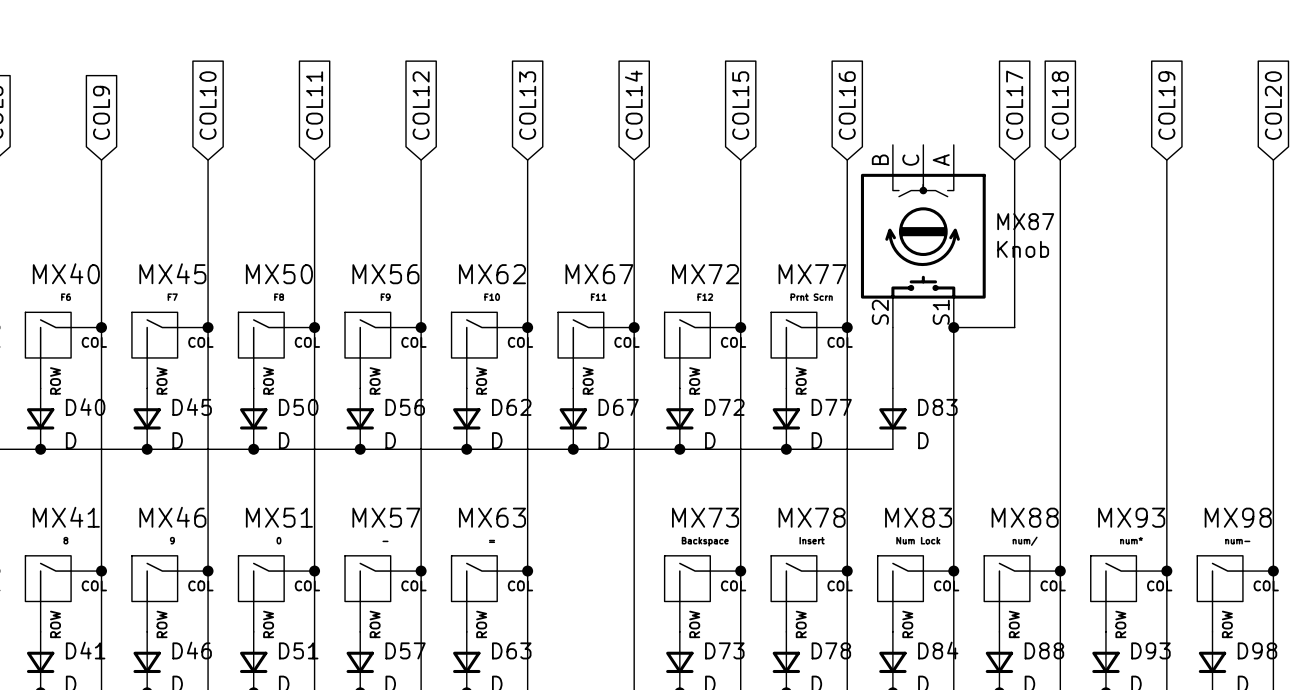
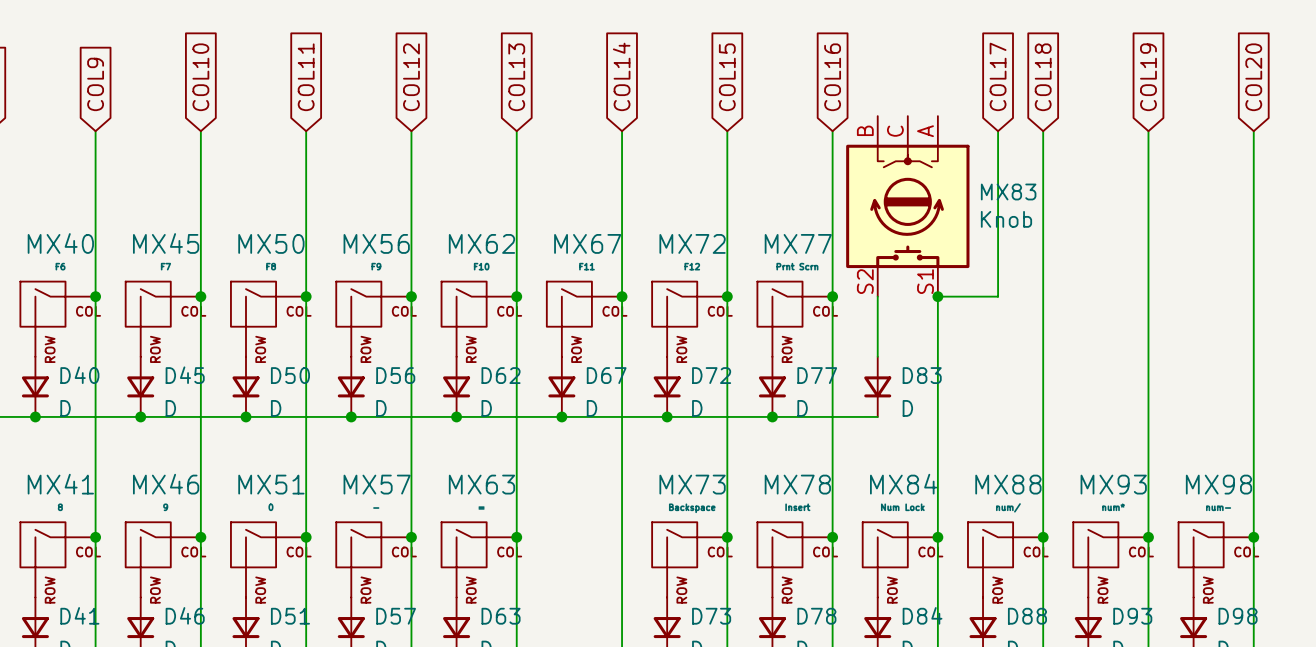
MX87 name: MX87 (1025, 221) -> MX83 (1008, 191)
MX83 name: MX83 (918, 517) -> MX84 (903, 484)

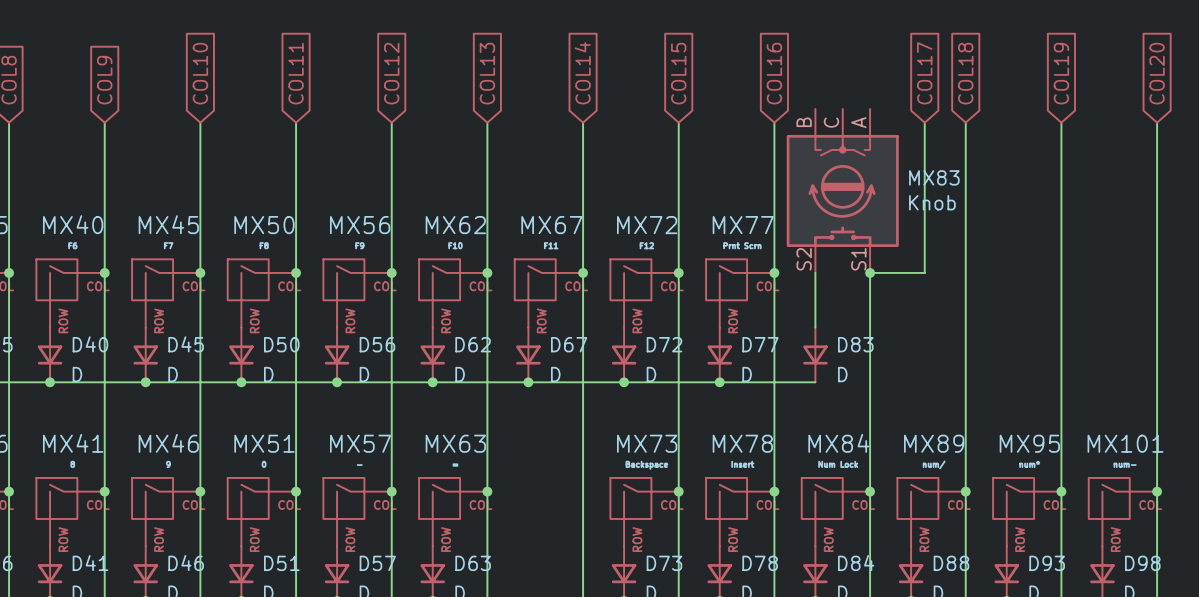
MX88 name: MX88 (1008, 484) -> MX89 (934, 443)
MX93 name: MX93 (1113, 484) -> MX95 (1029, 443)
MX98 name: MX98 (1218, 484) -> MX101 (1125, 443)

